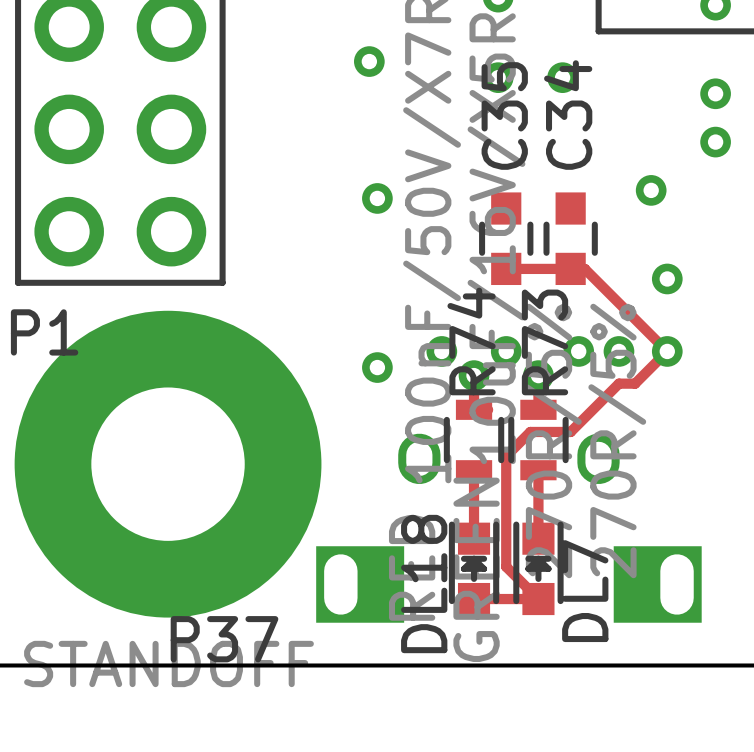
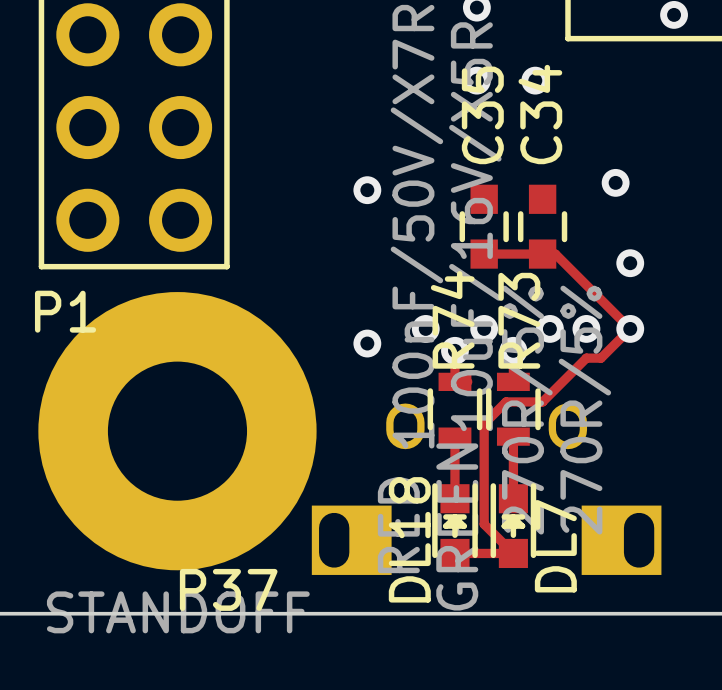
via: (369, 61) -> none
via: (715, 93) -> none
via: (715, 142) -> none

